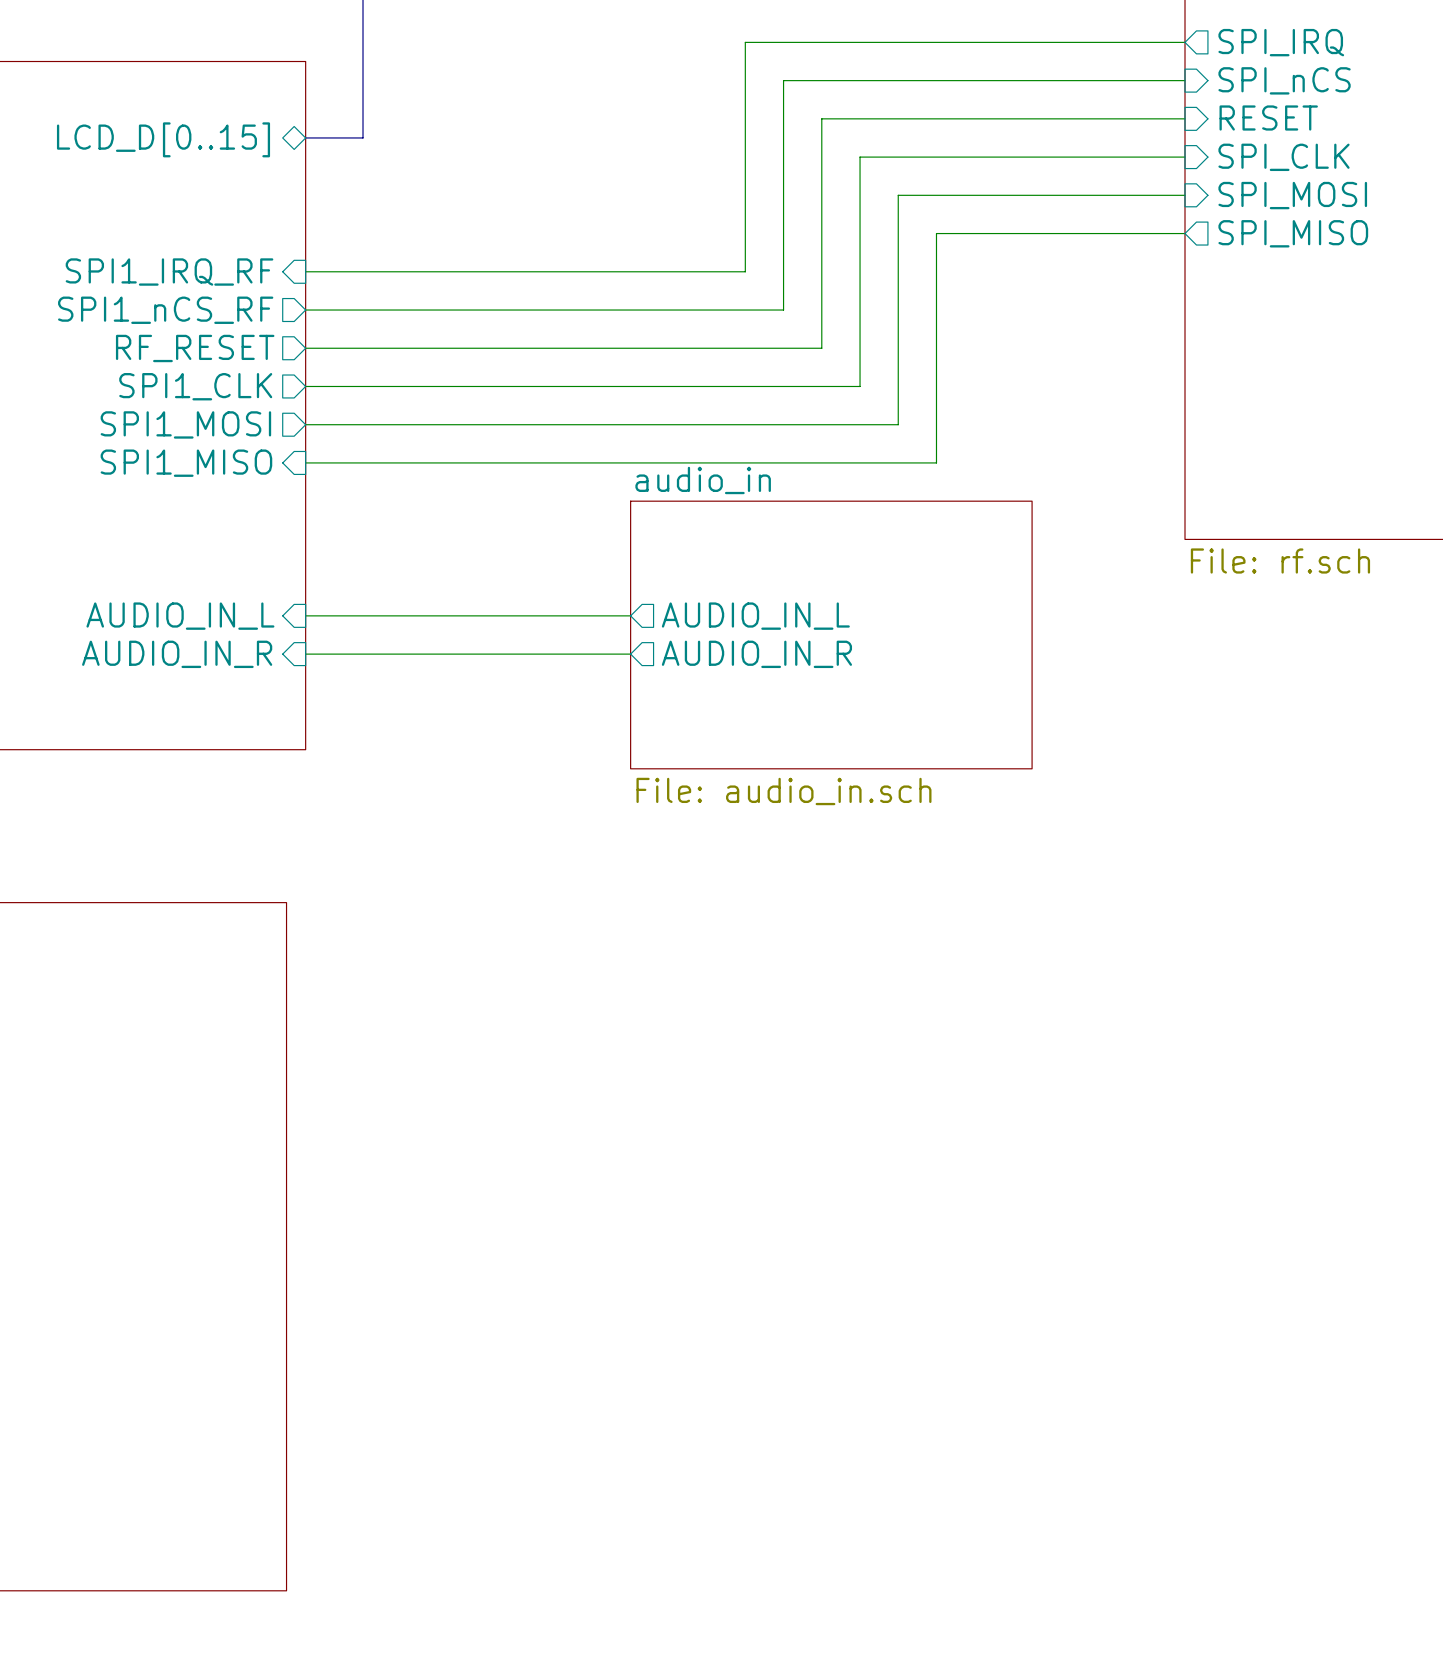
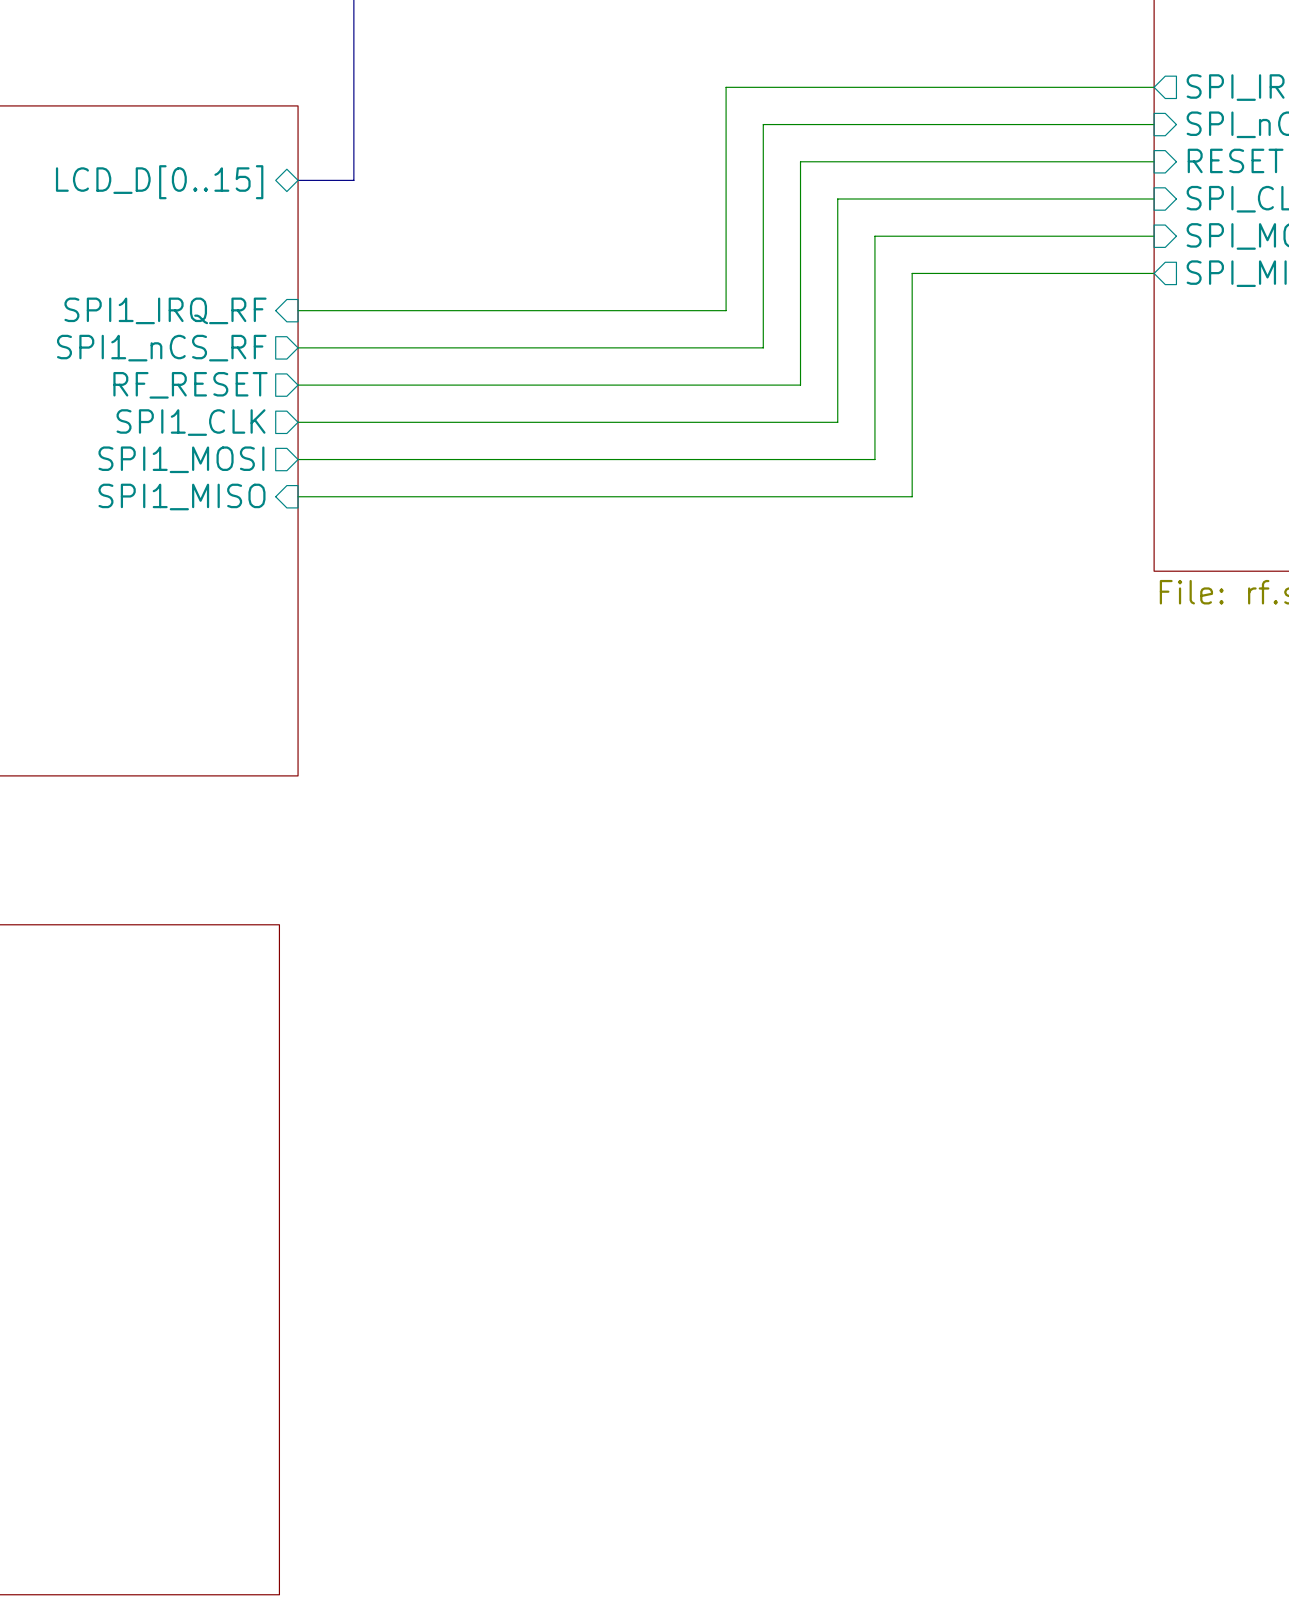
wire: (305, 615) (630, 615) -> none
sheet pin: AUDIO_IN_L (180, 616) -> none
sheet pin: AUDIO_IN_L (755, 616) -> none
sheet audio_in: File: audio_in.sch (831, 634) -> none
sheet pin: AUDIO_IN_R (177, 654) -> none
wire: (305, 654) (630, 654) -> none
sheet pin: AUDIO_IN_R (756, 654) -> none

